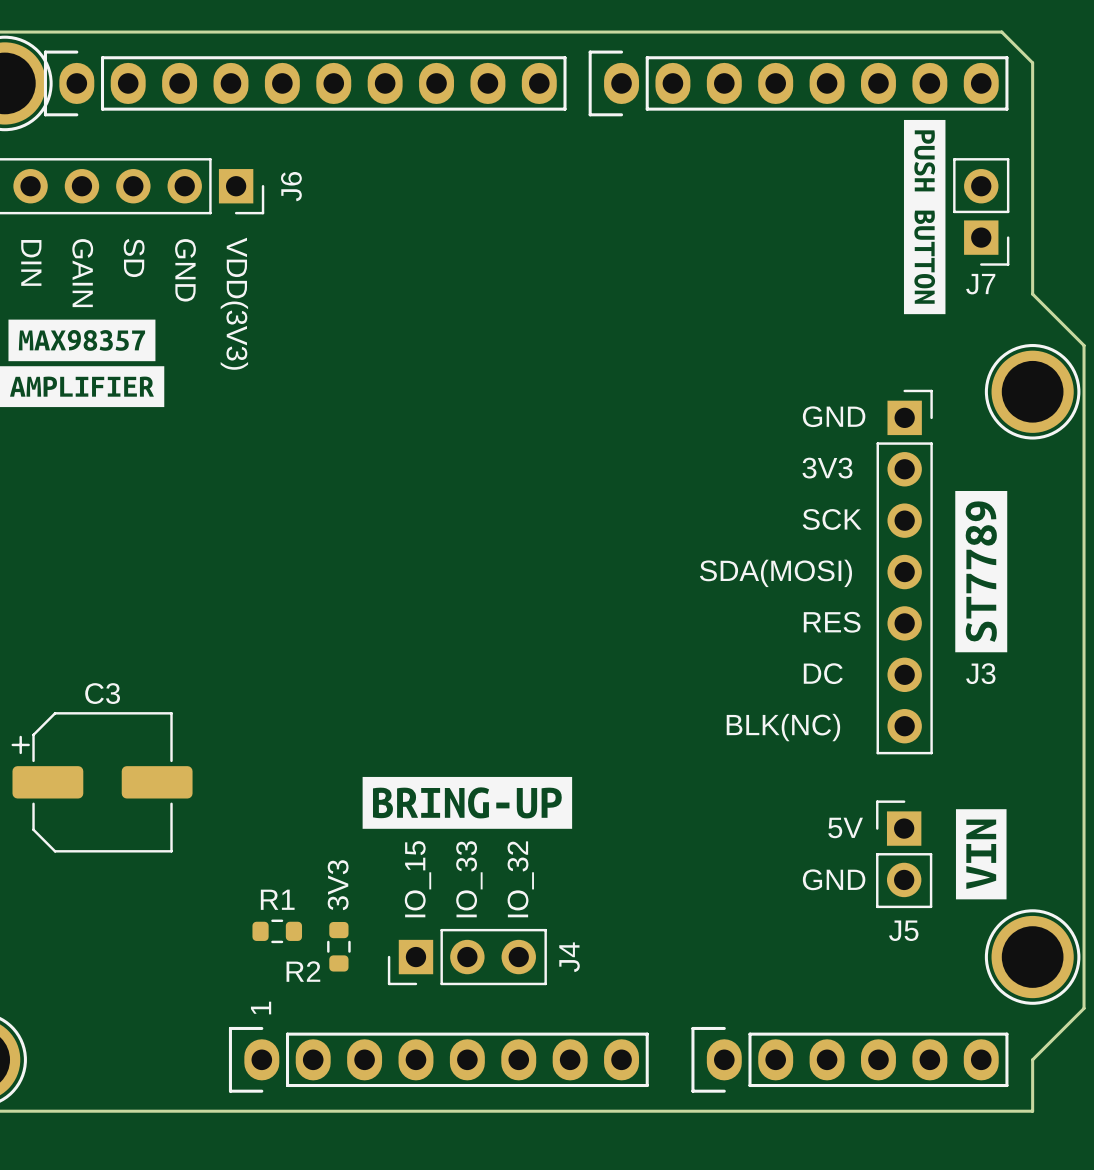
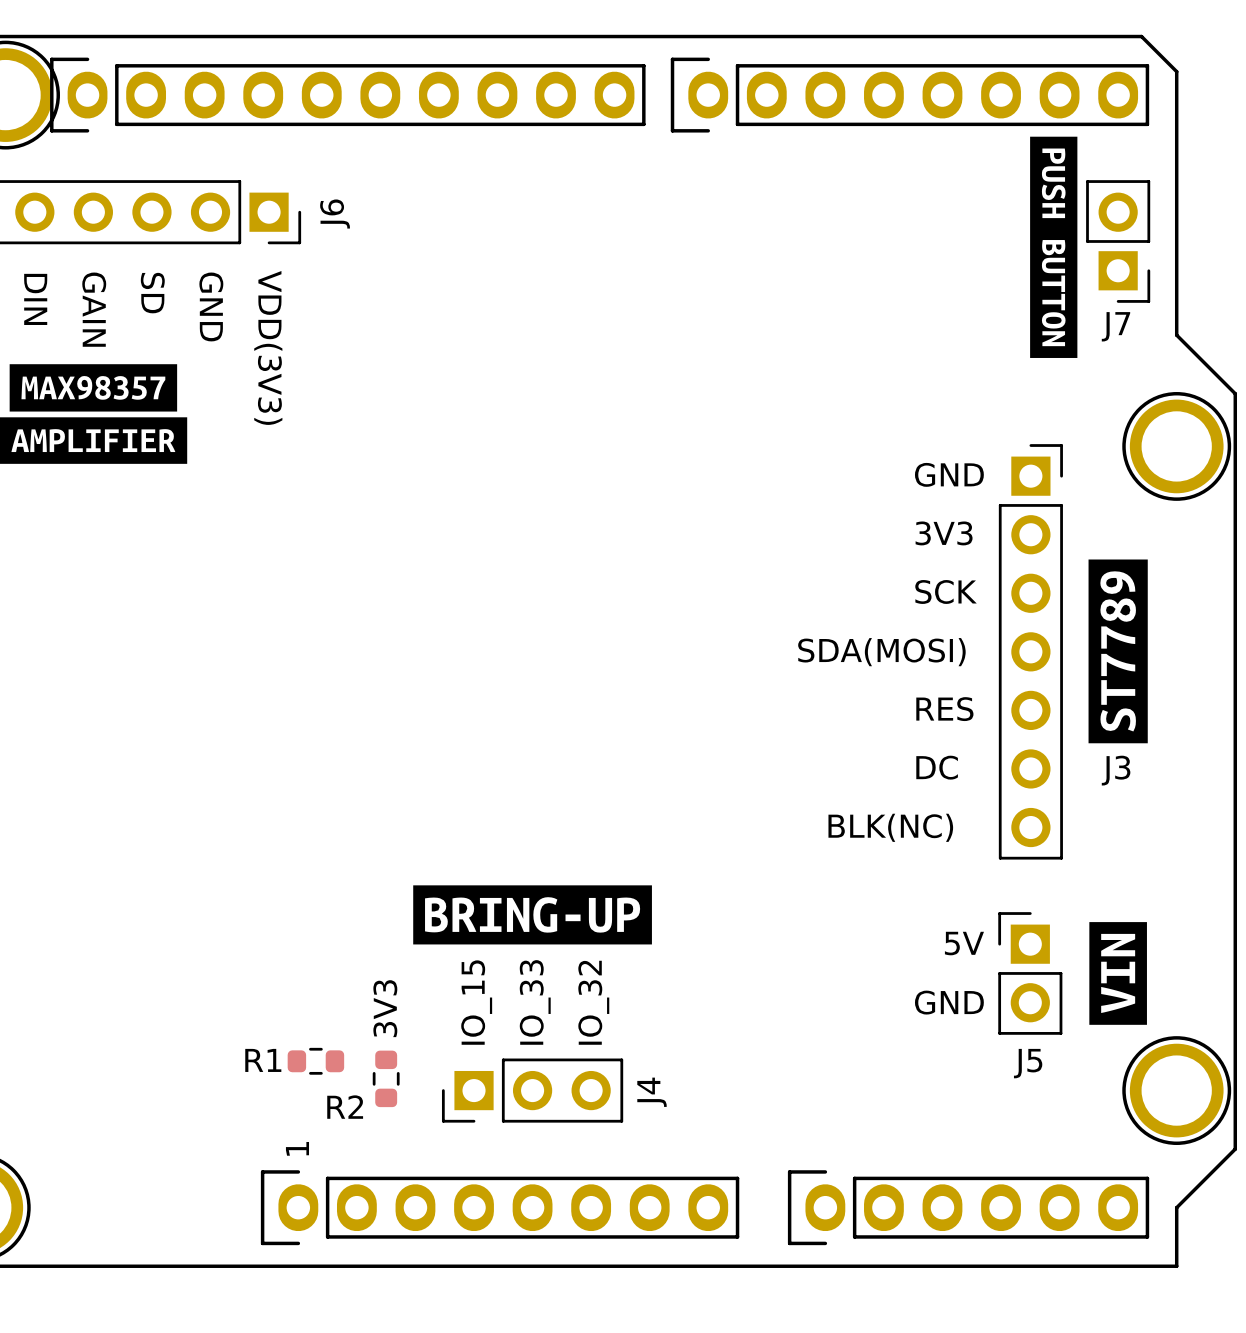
C3: (102, 782) -> none
R1 name position: R1 (277, 899) -> R1 (263, 1060)

